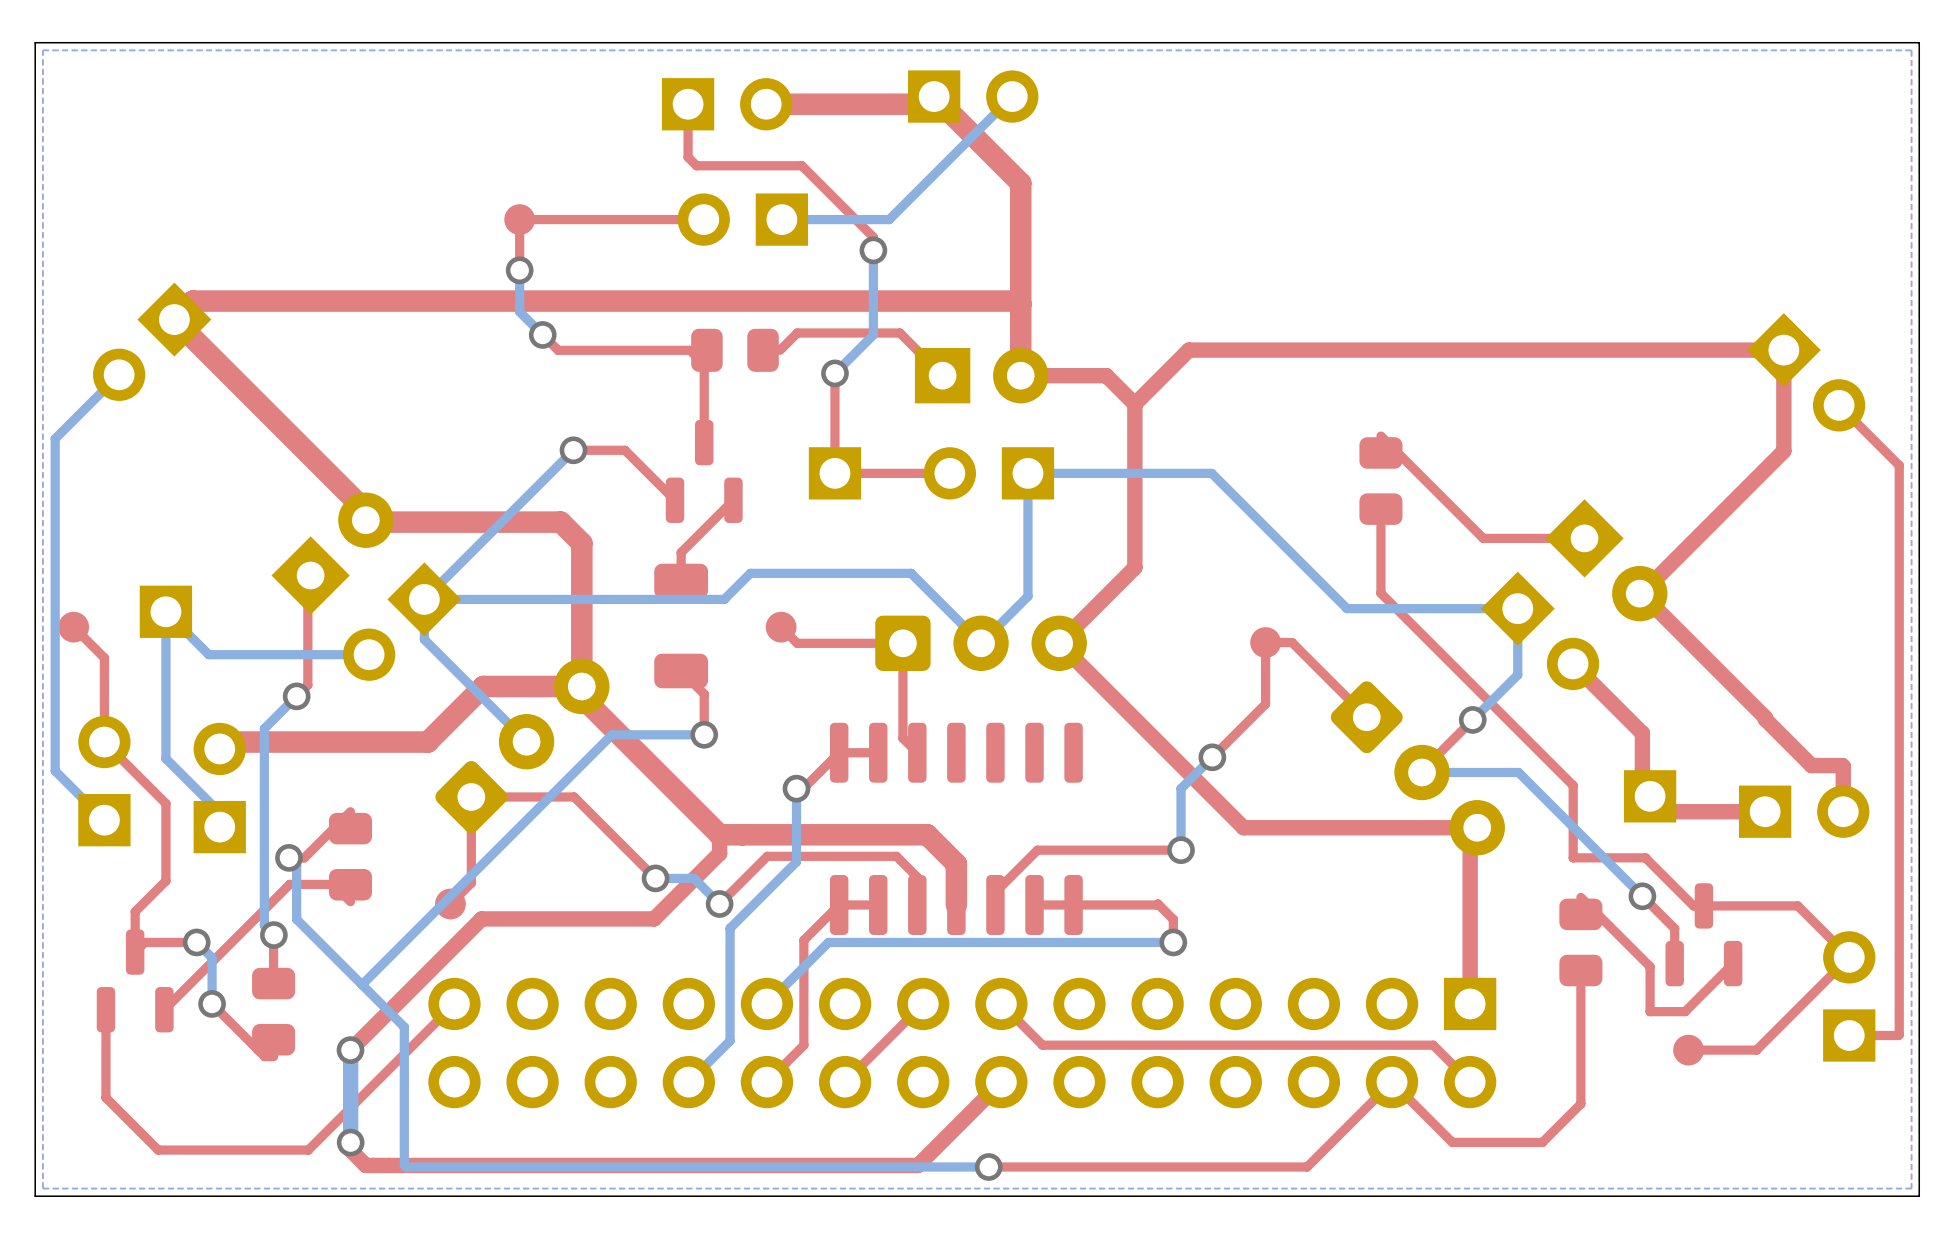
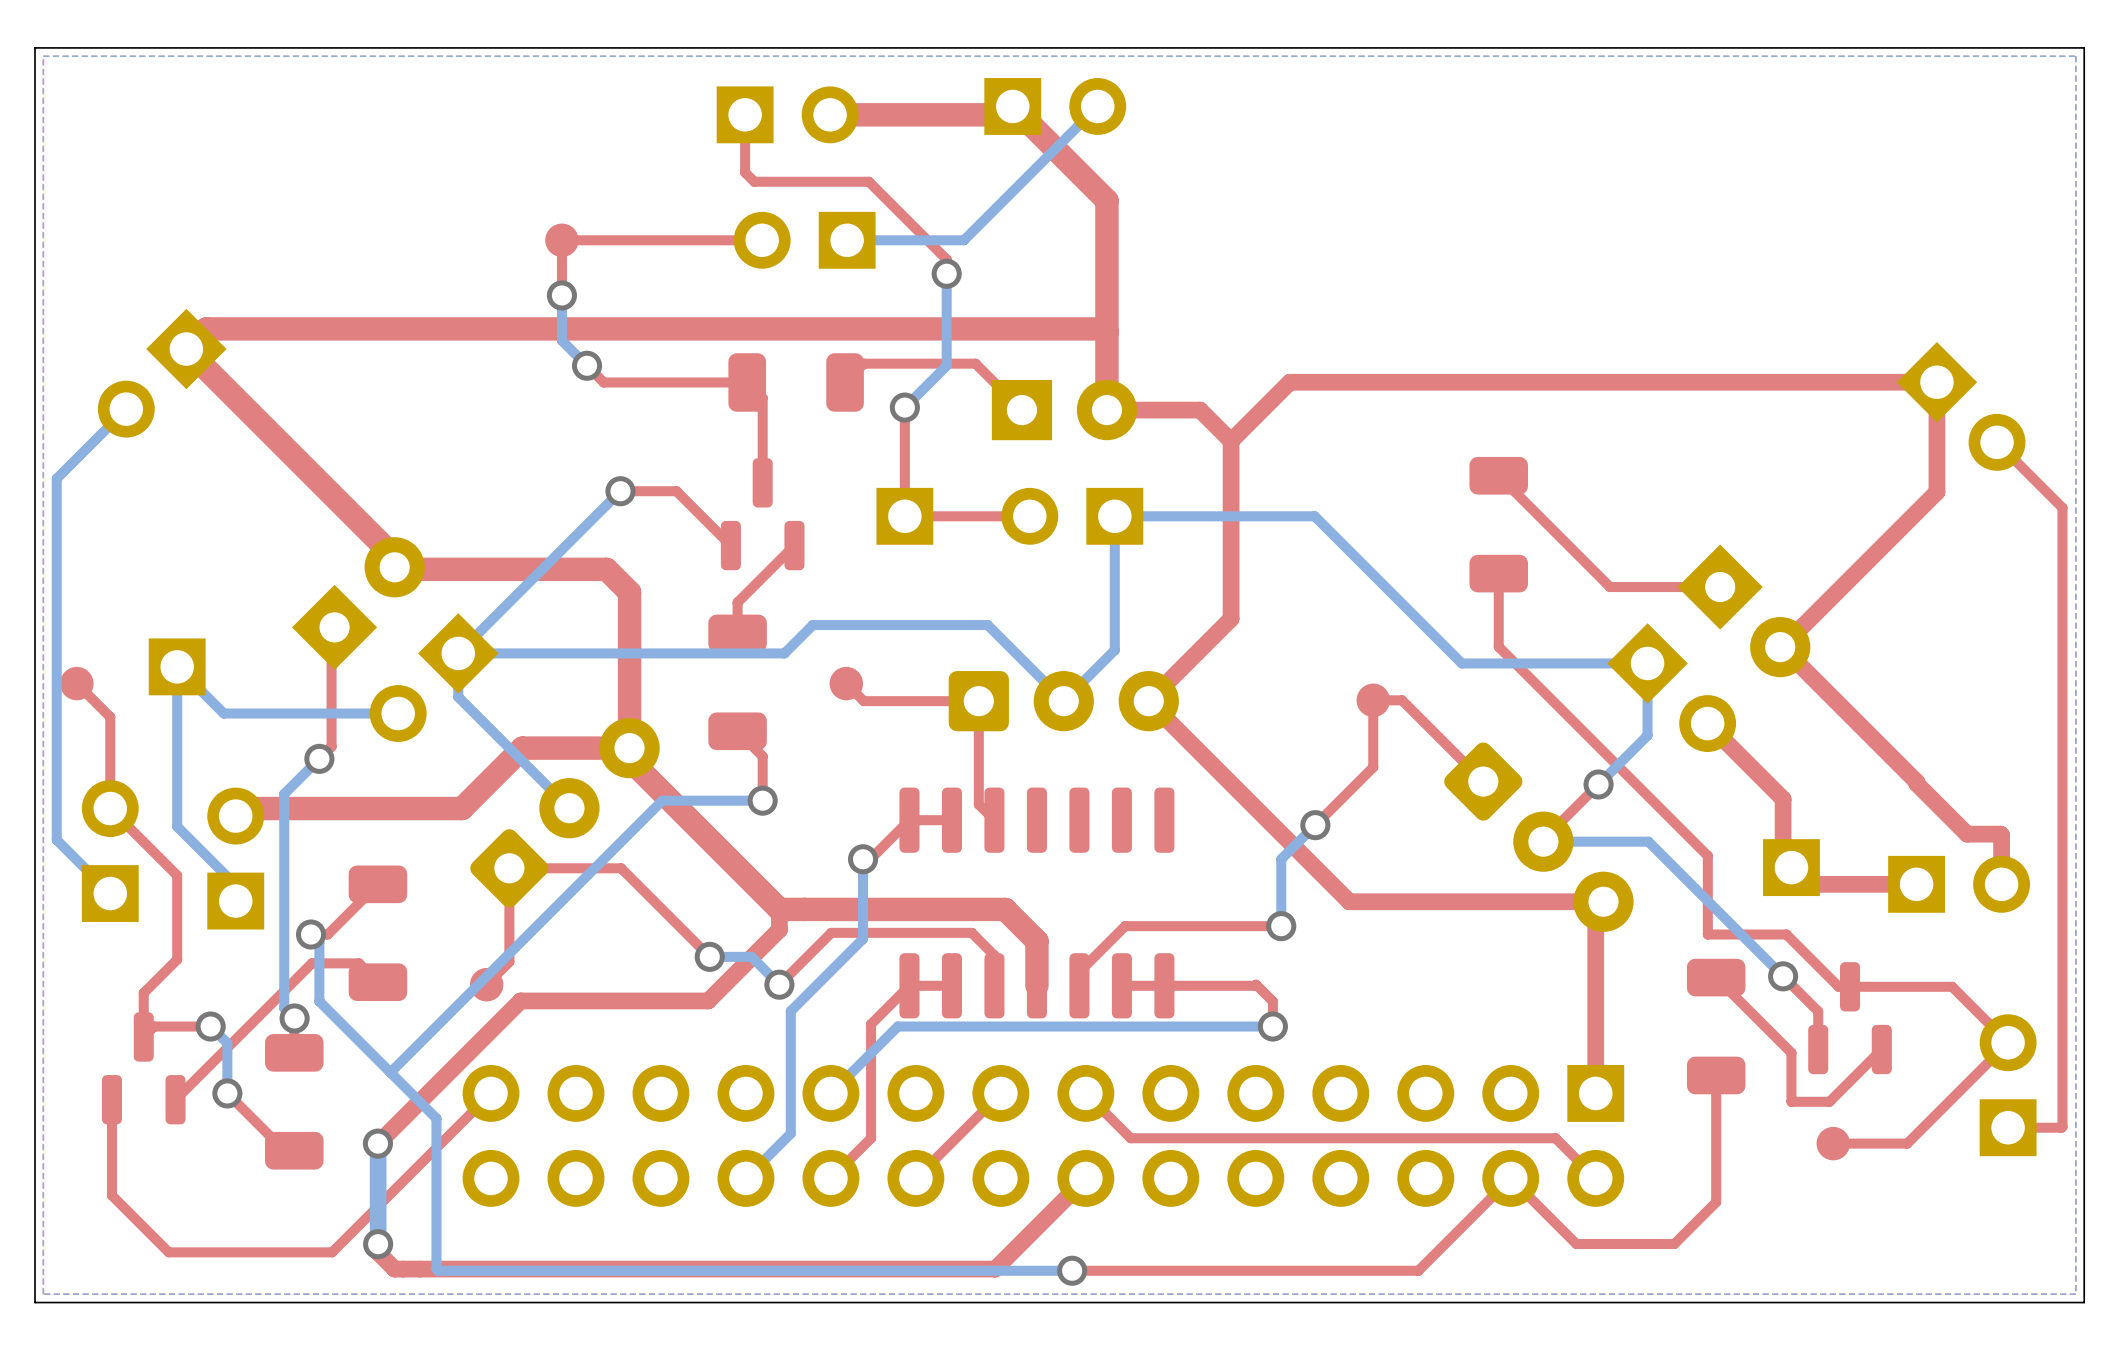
part footprint: [691, 328, 779, 372] -> [728, 353, 864, 412]
part footprint: [1359, 437, 1403, 525] -> [1469, 456, 1529, 593]
part footprint: [328, 812, 373, 901] -> [348, 865, 408, 1002]
part footprint: [1559, 898, 1603, 987] -> [1686, 958, 1746, 1095]
part footprint: [252, 967, 296, 1056] -> [265, 1034, 324, 1170]

